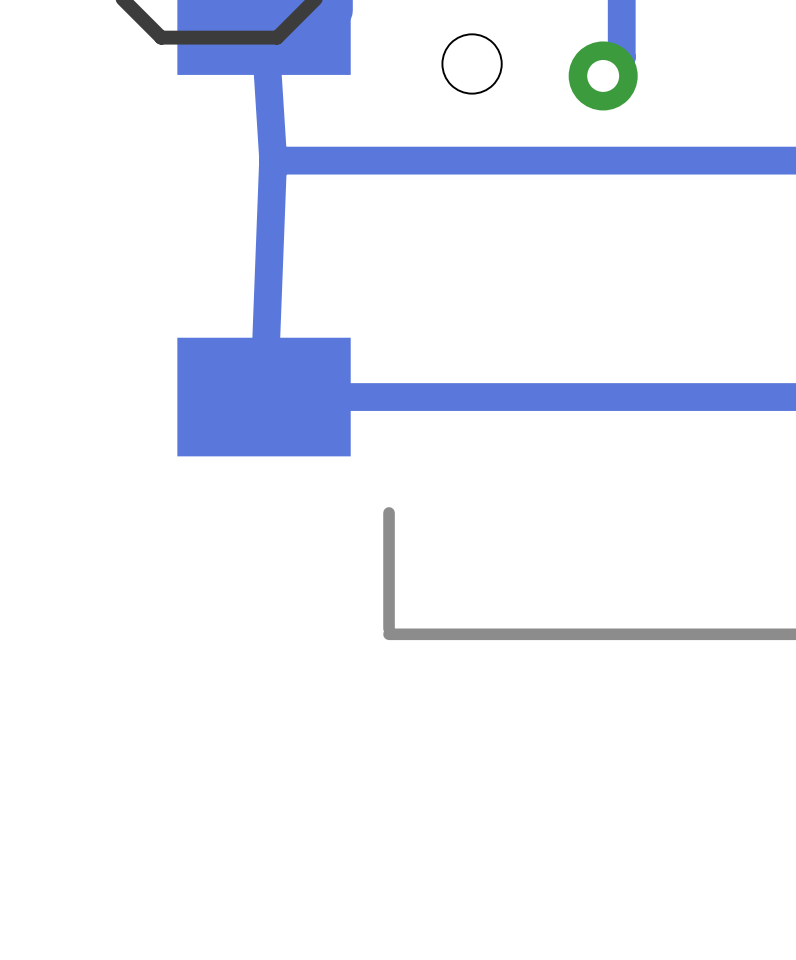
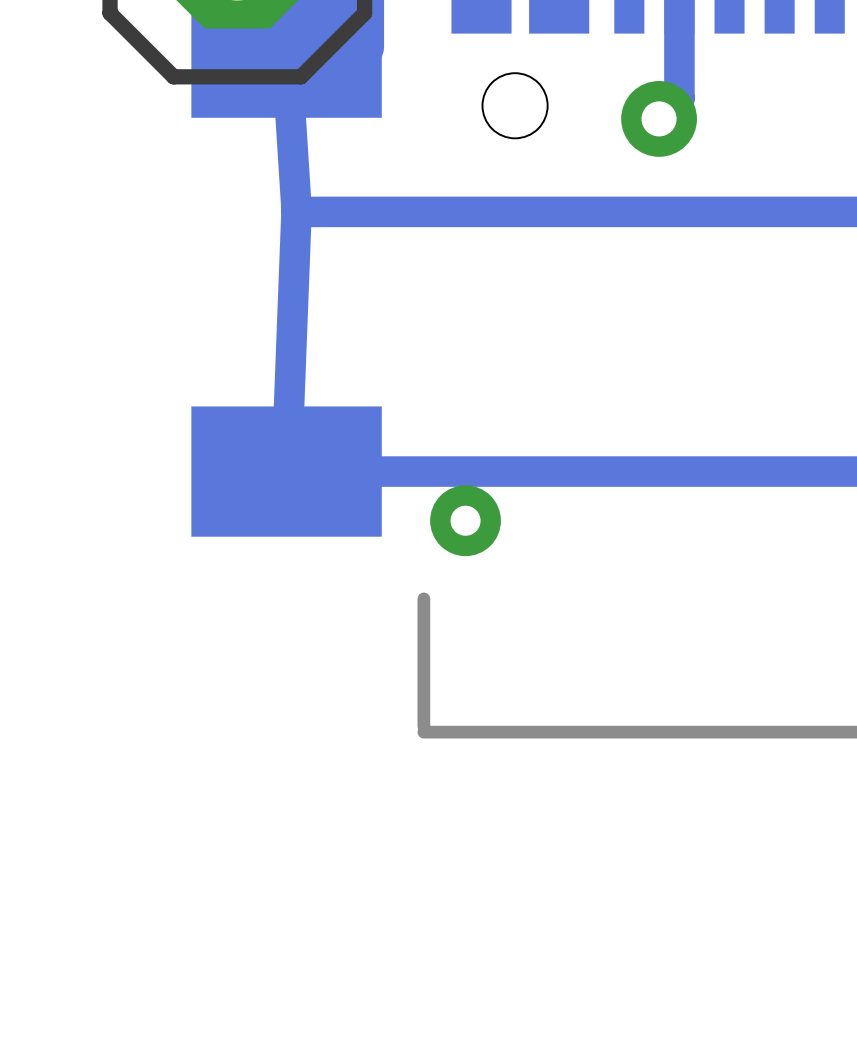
via: none -> (465, 520)

